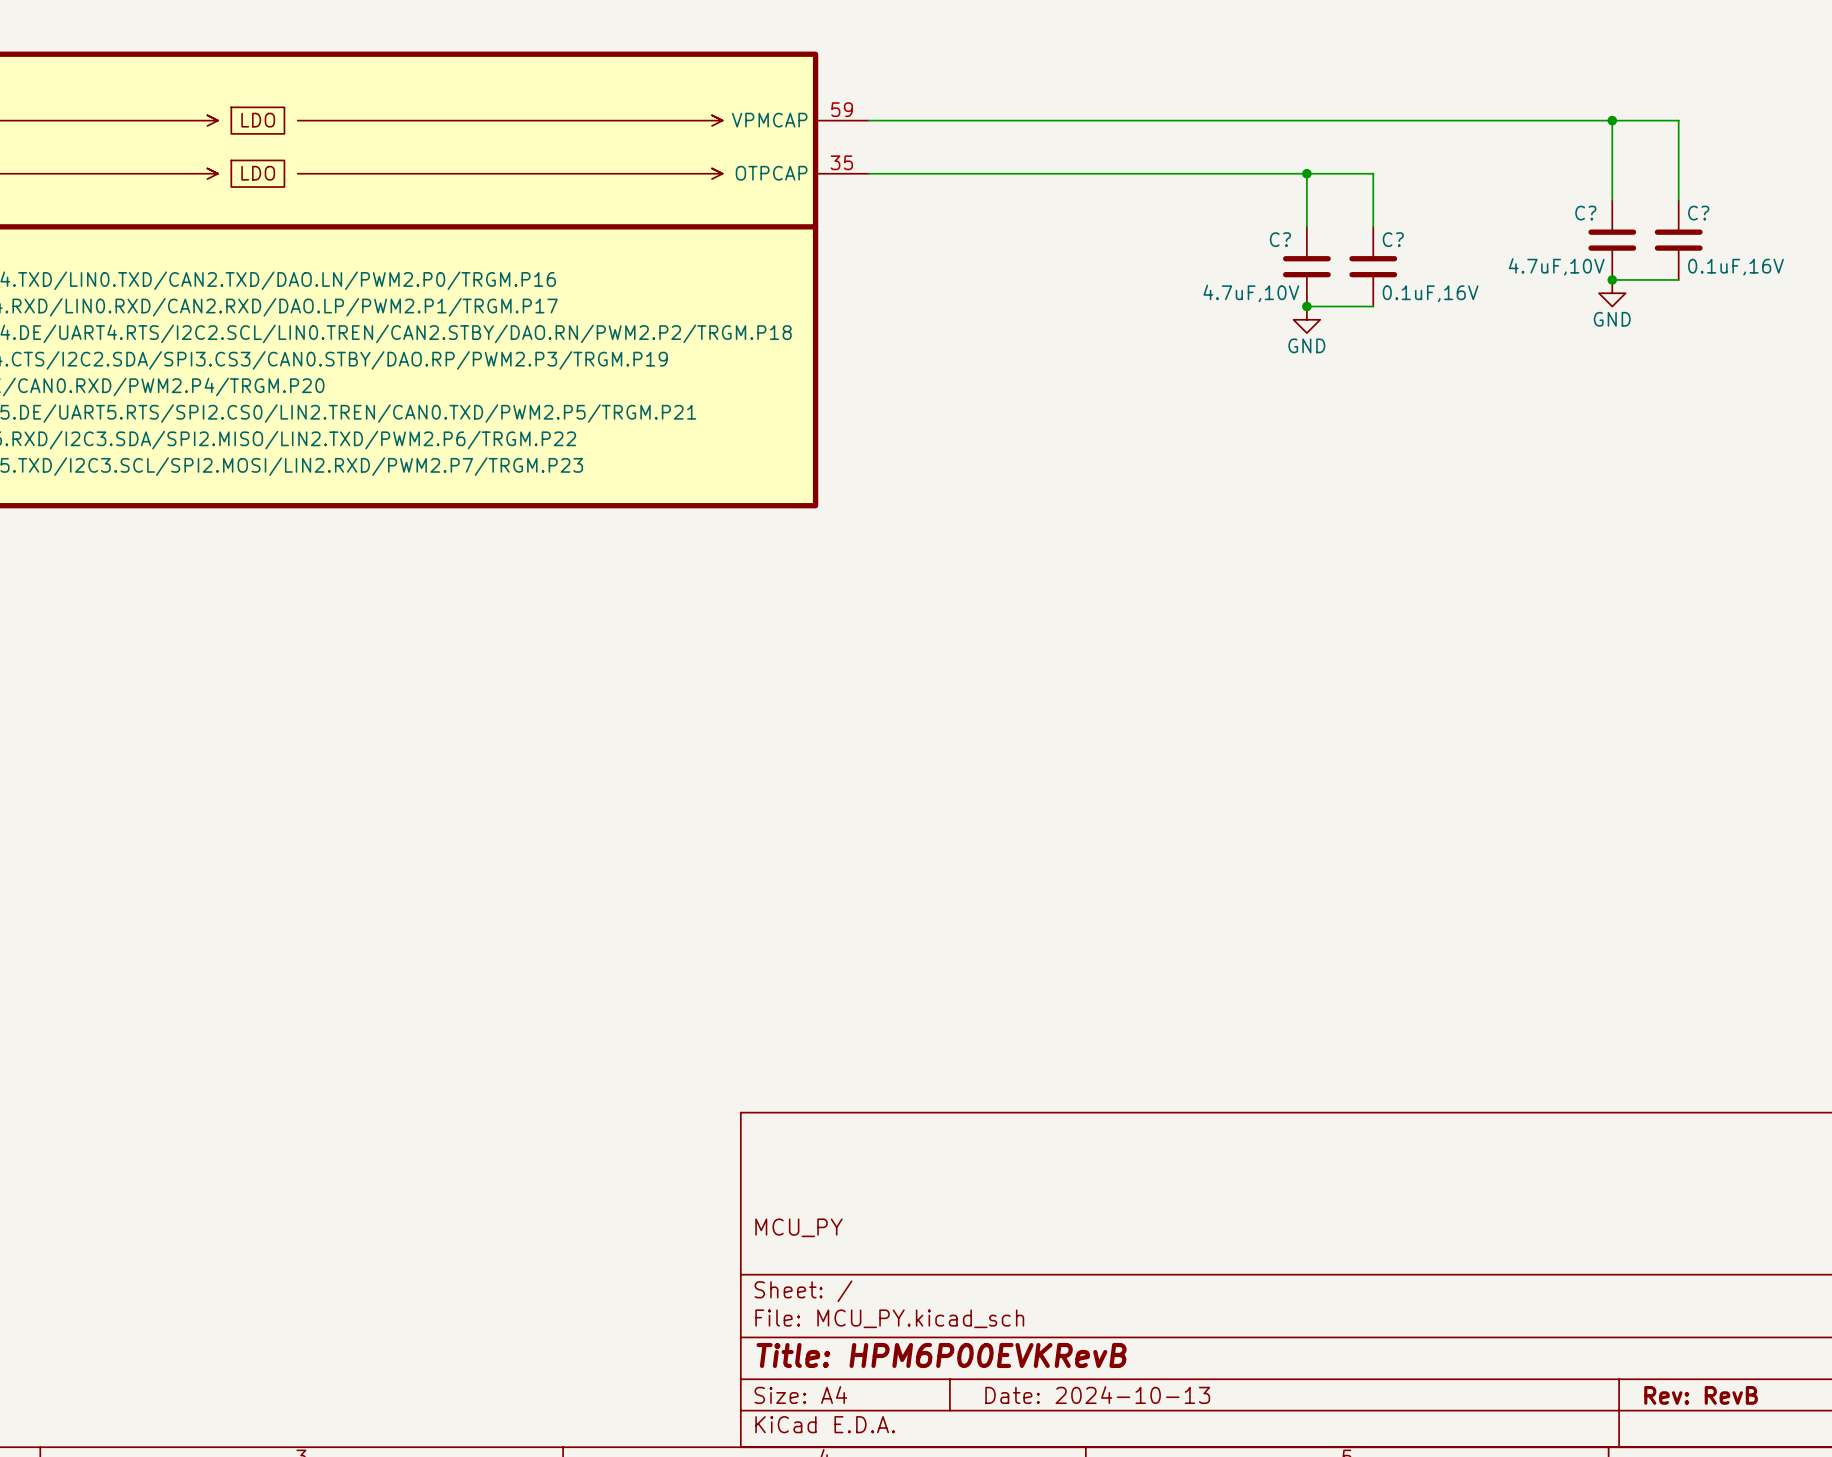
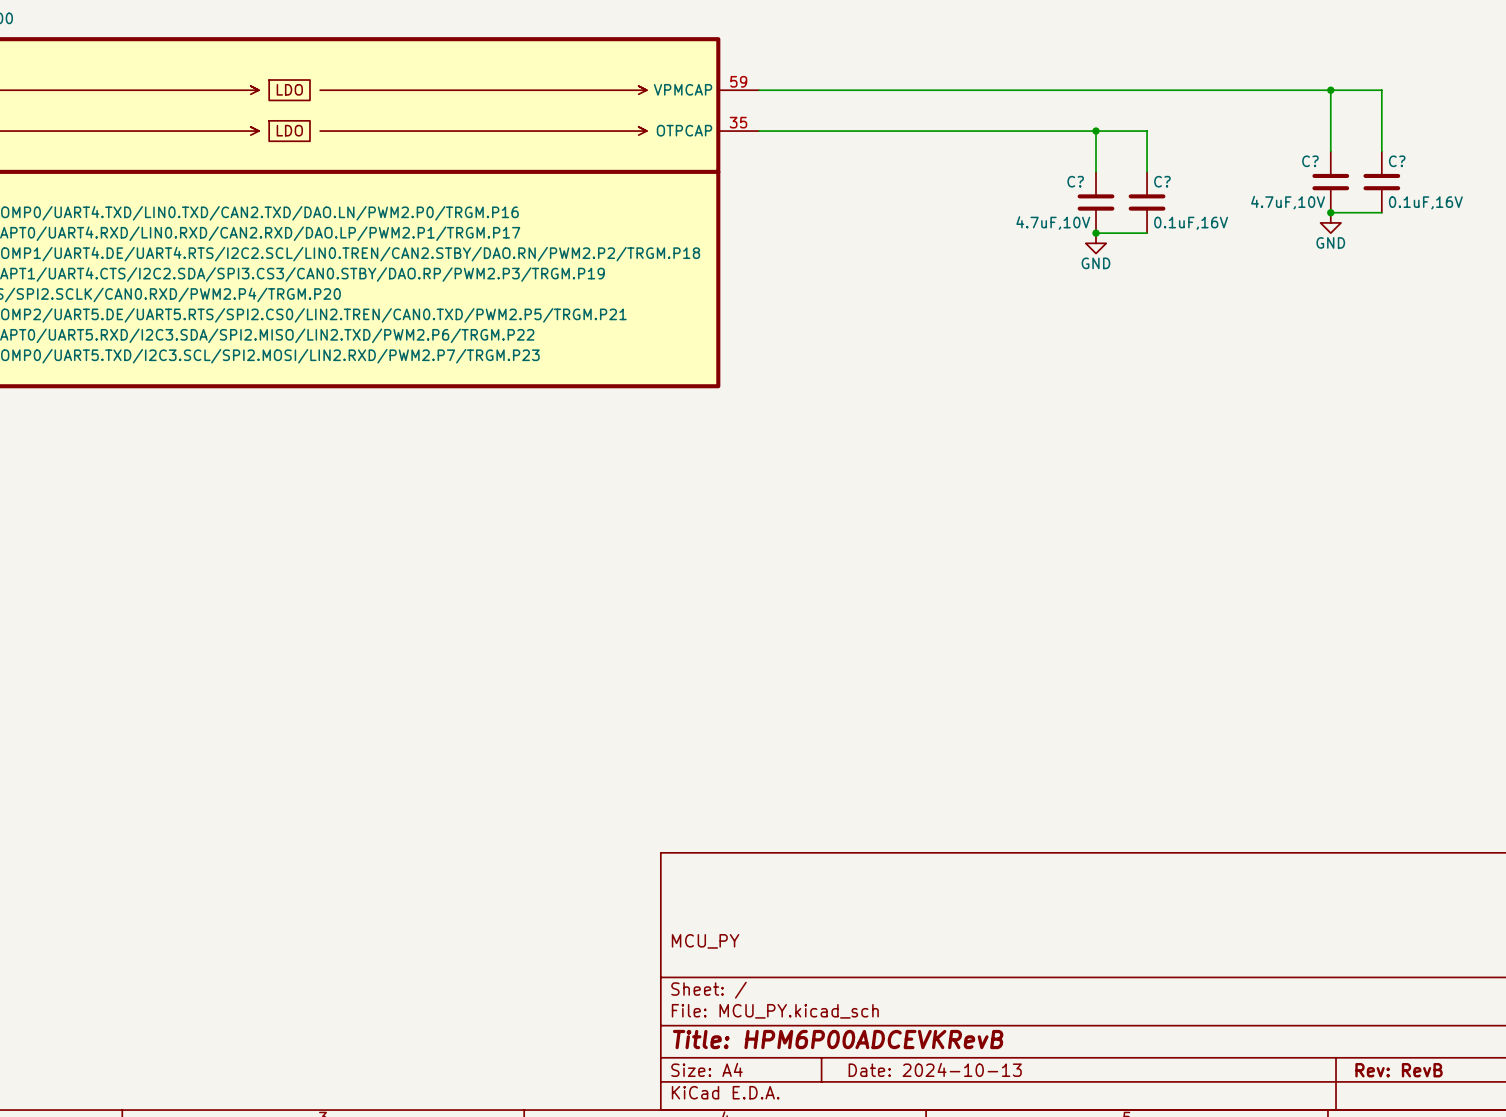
title block: Title: HPM6P00EVKRevB (941, 1355) -> Title: HPM6P00ADCEVKRevB (838, 1039)

